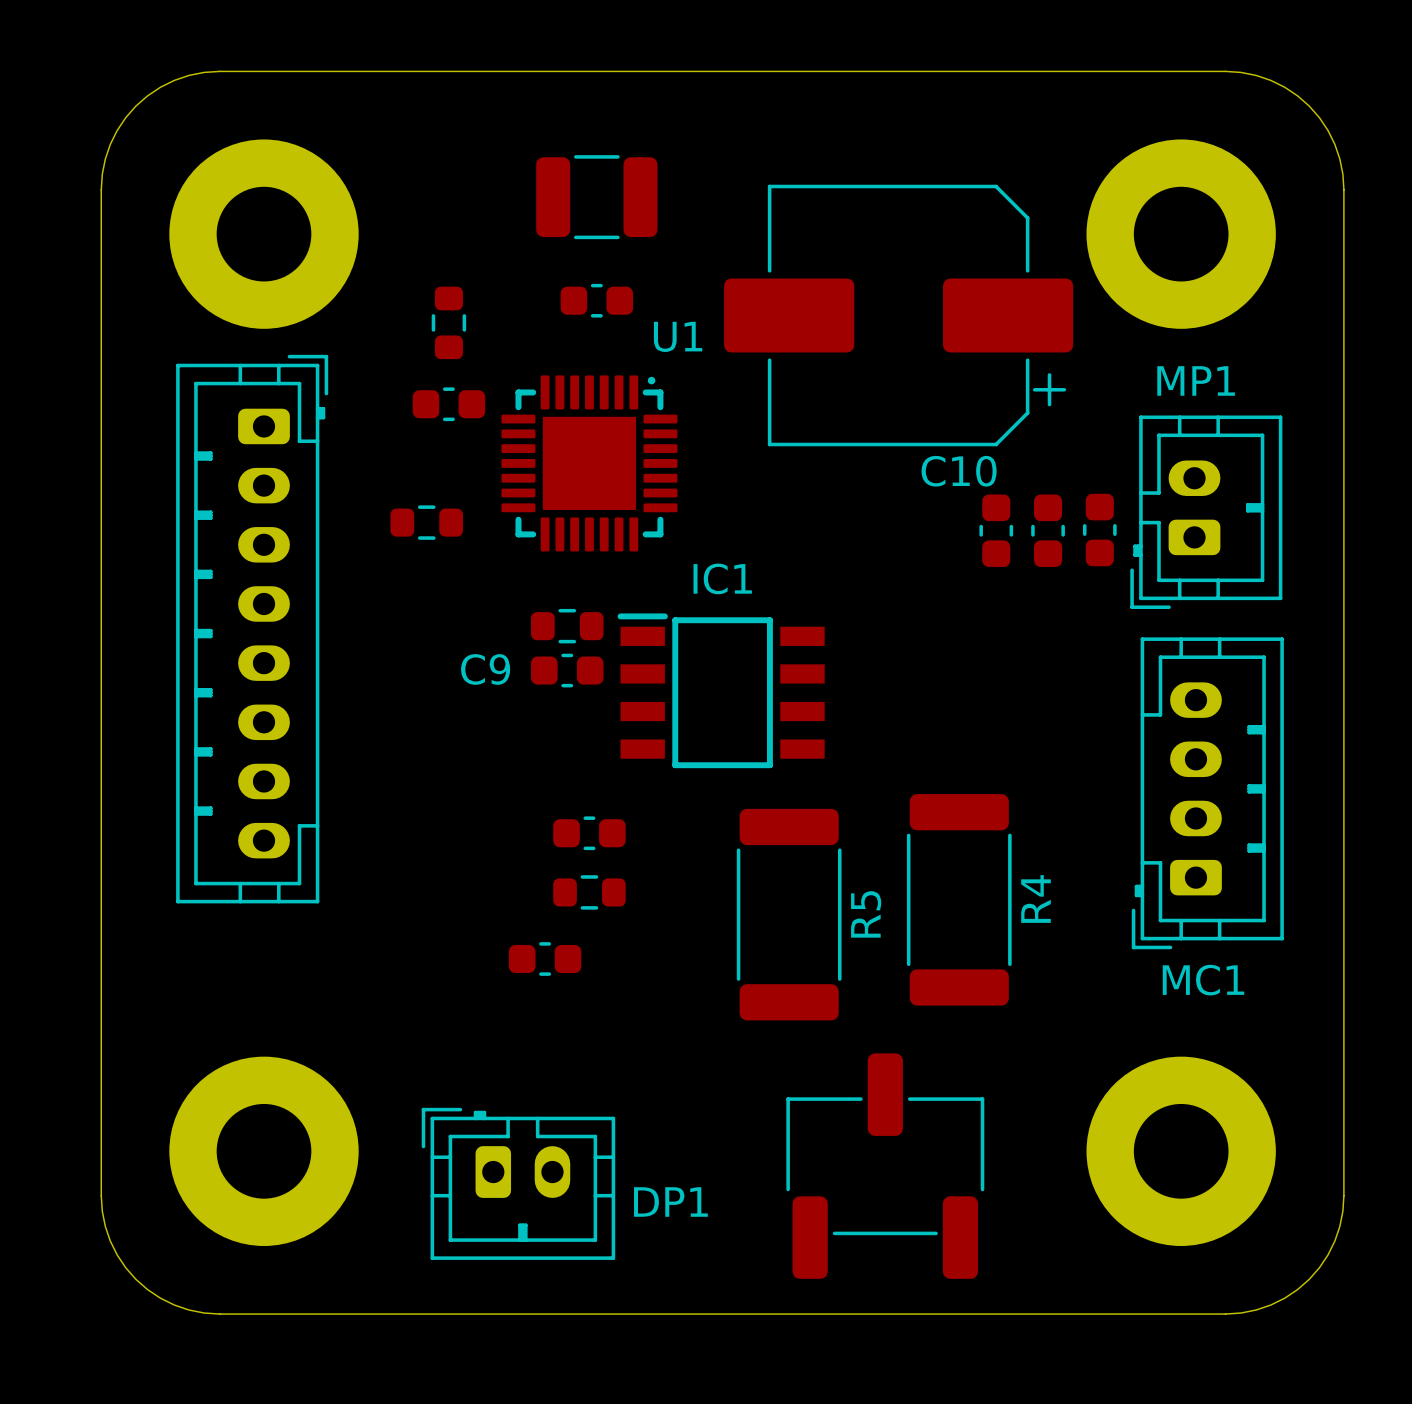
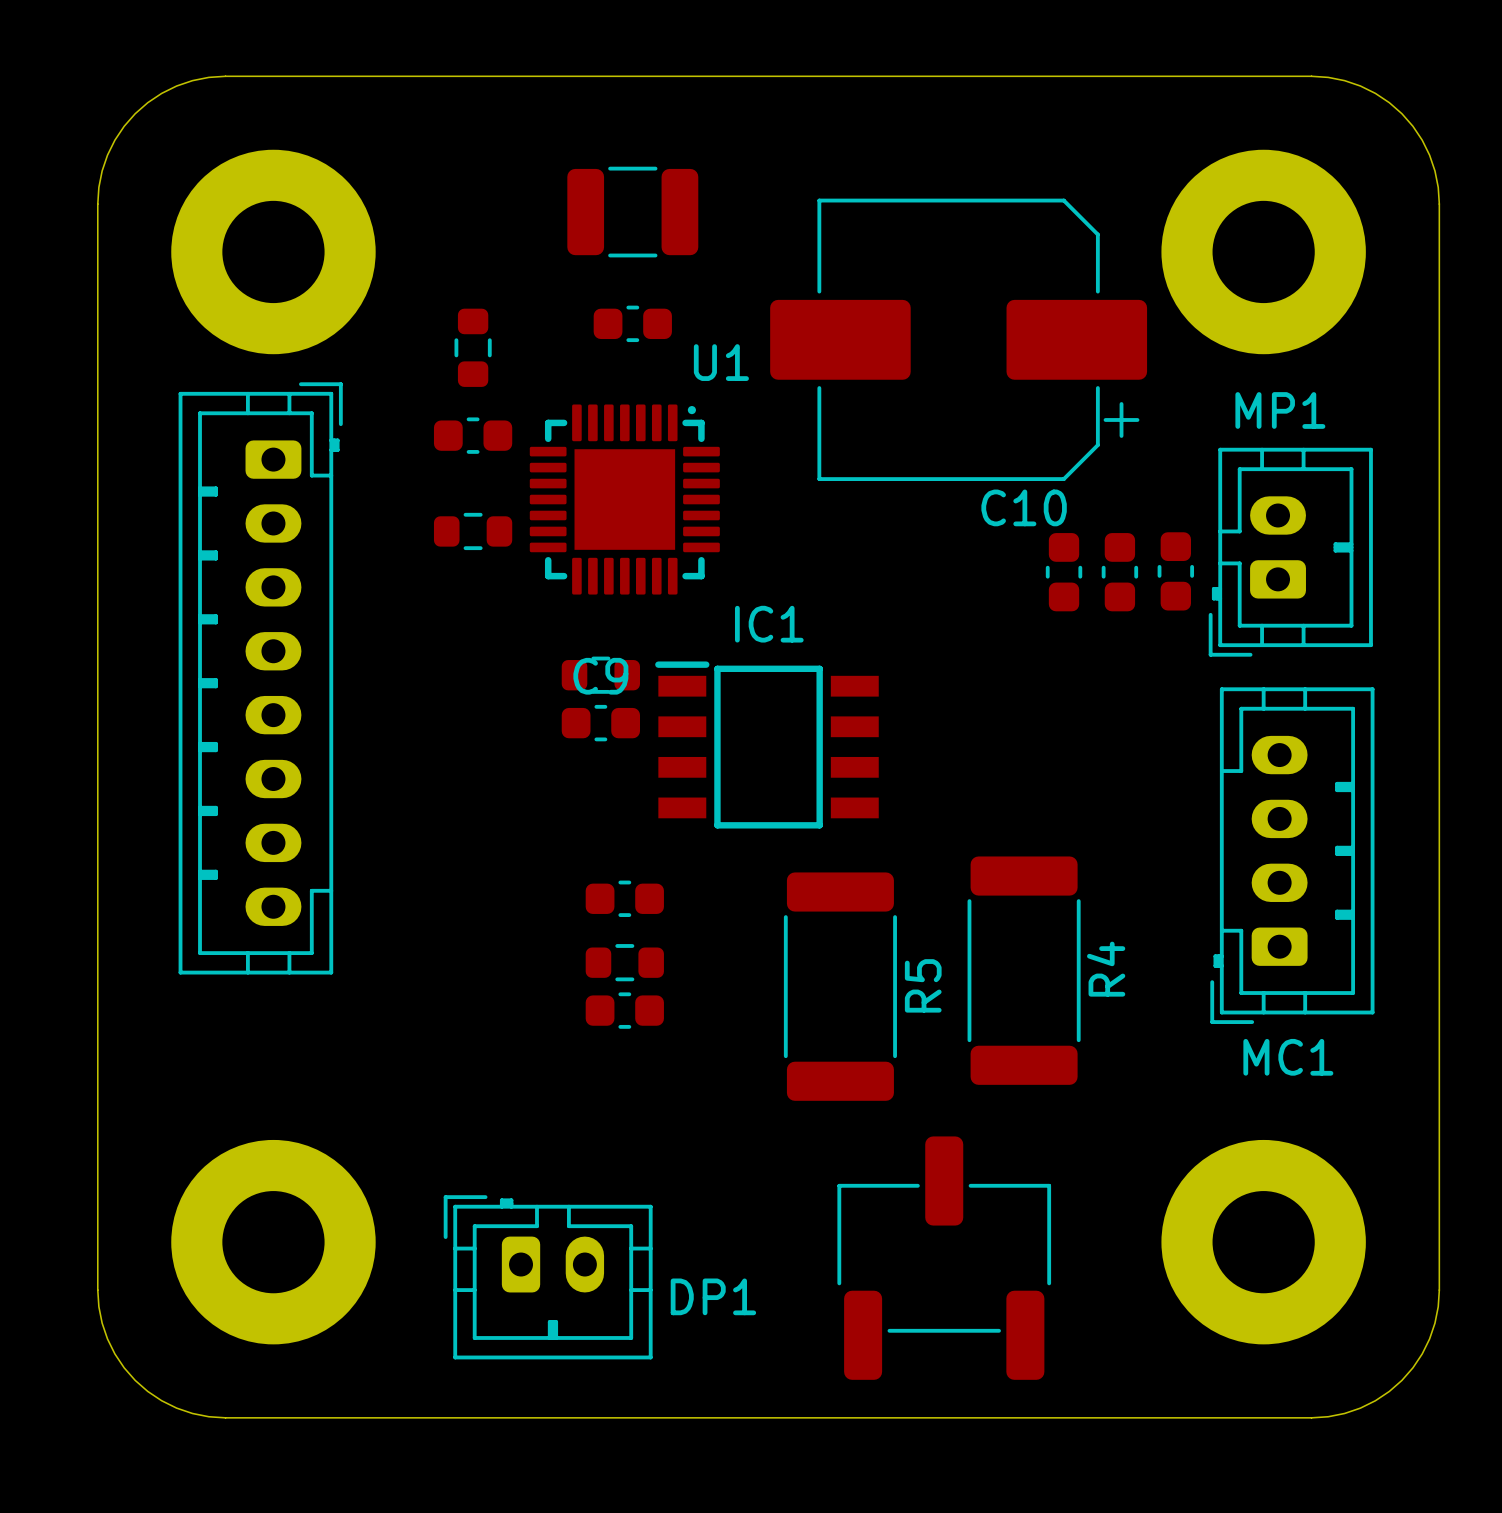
part position: (426, 522) -> (473, 531)
C9 name position: C9 (485, 669) -> C9 (600, 676)
part position: (545, 959) -> (624, 1010)

